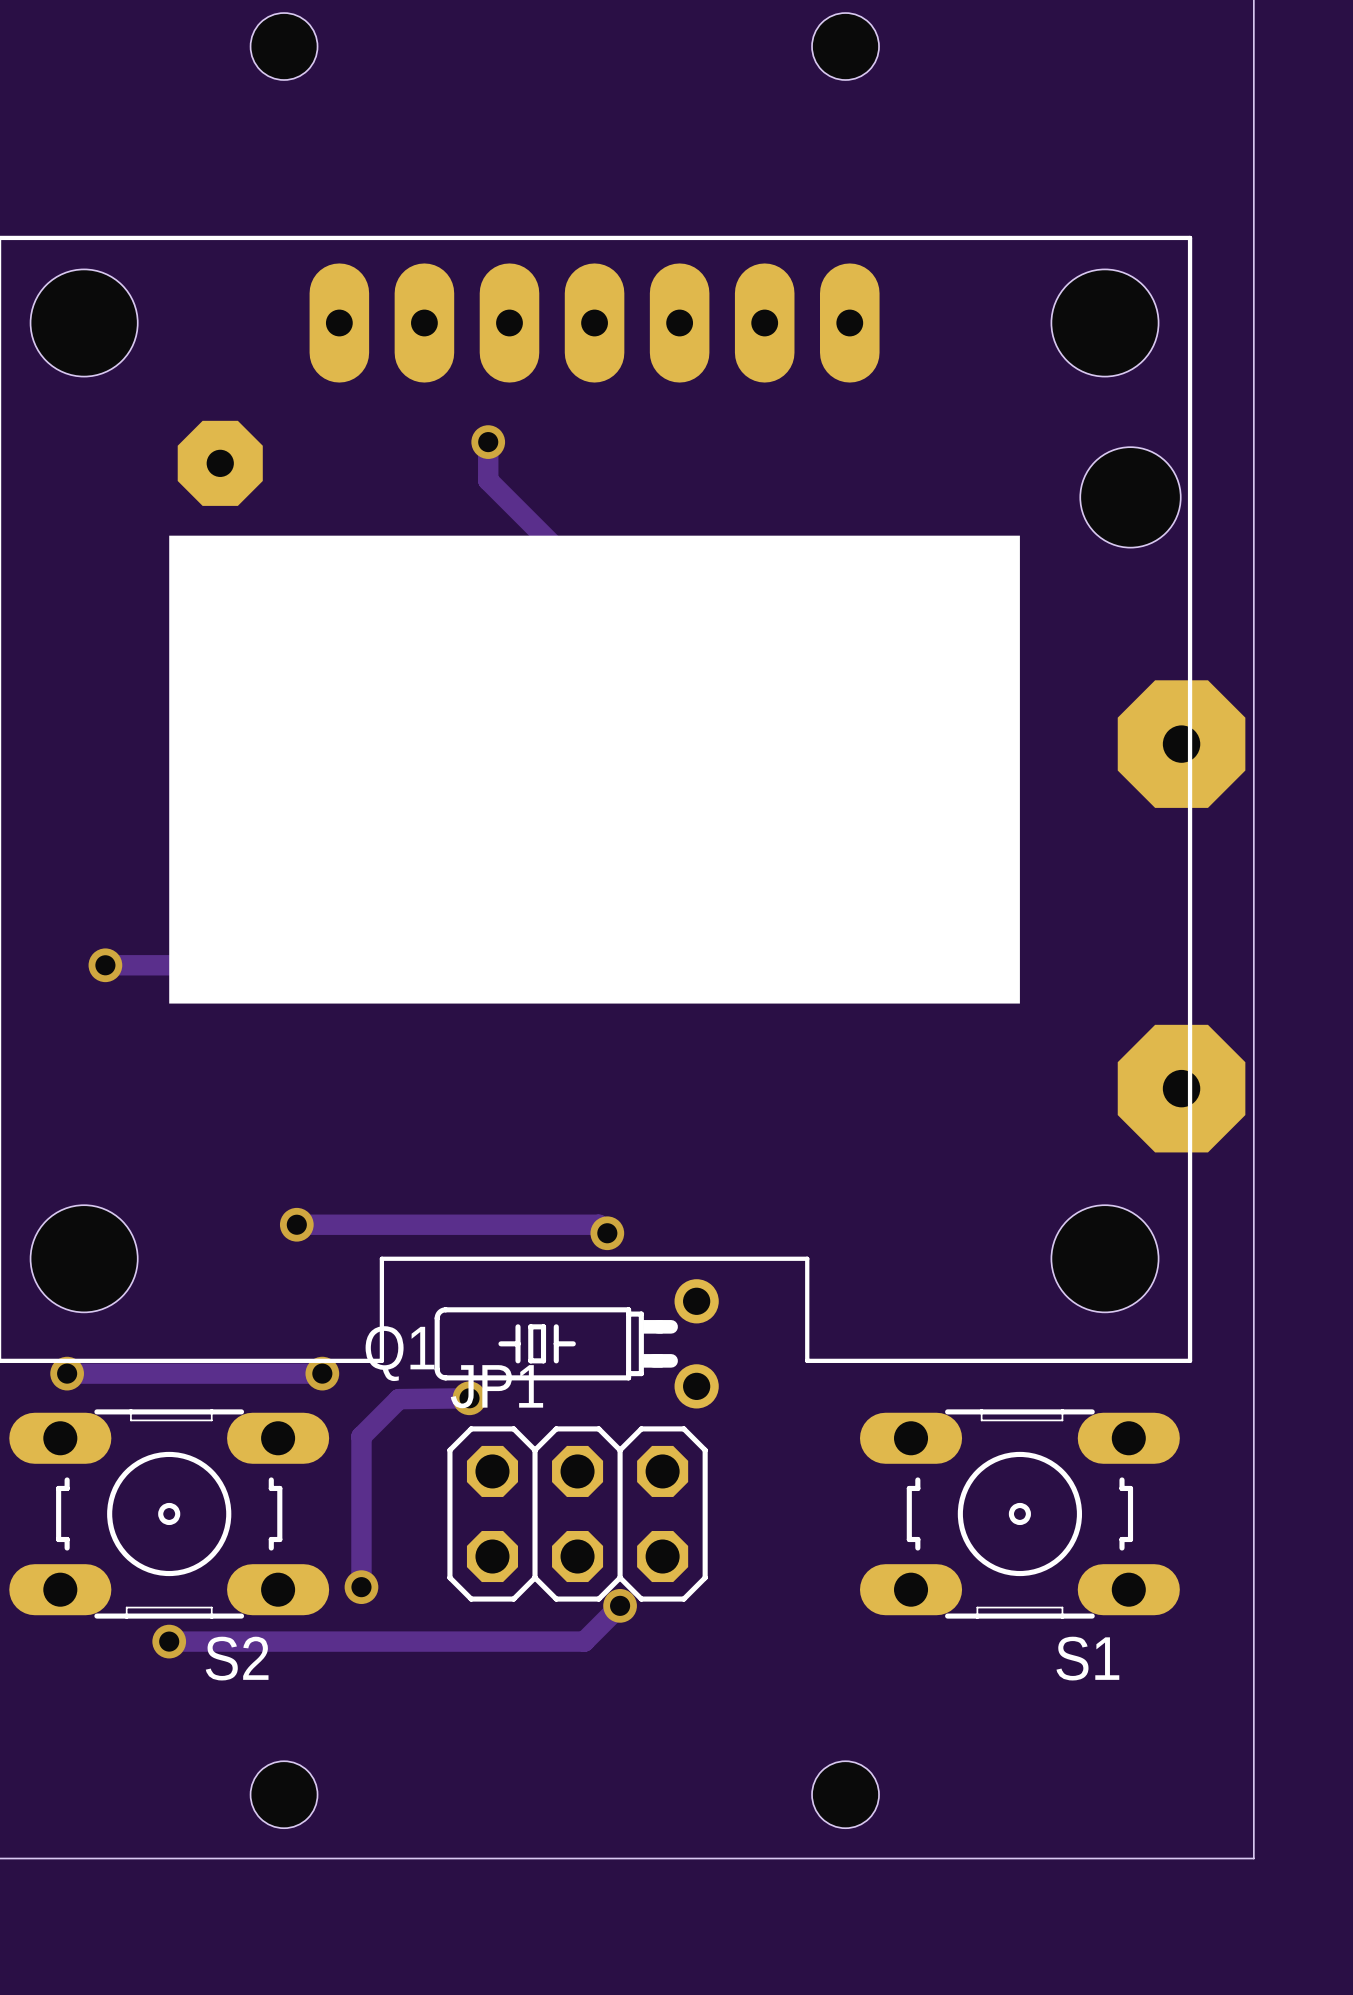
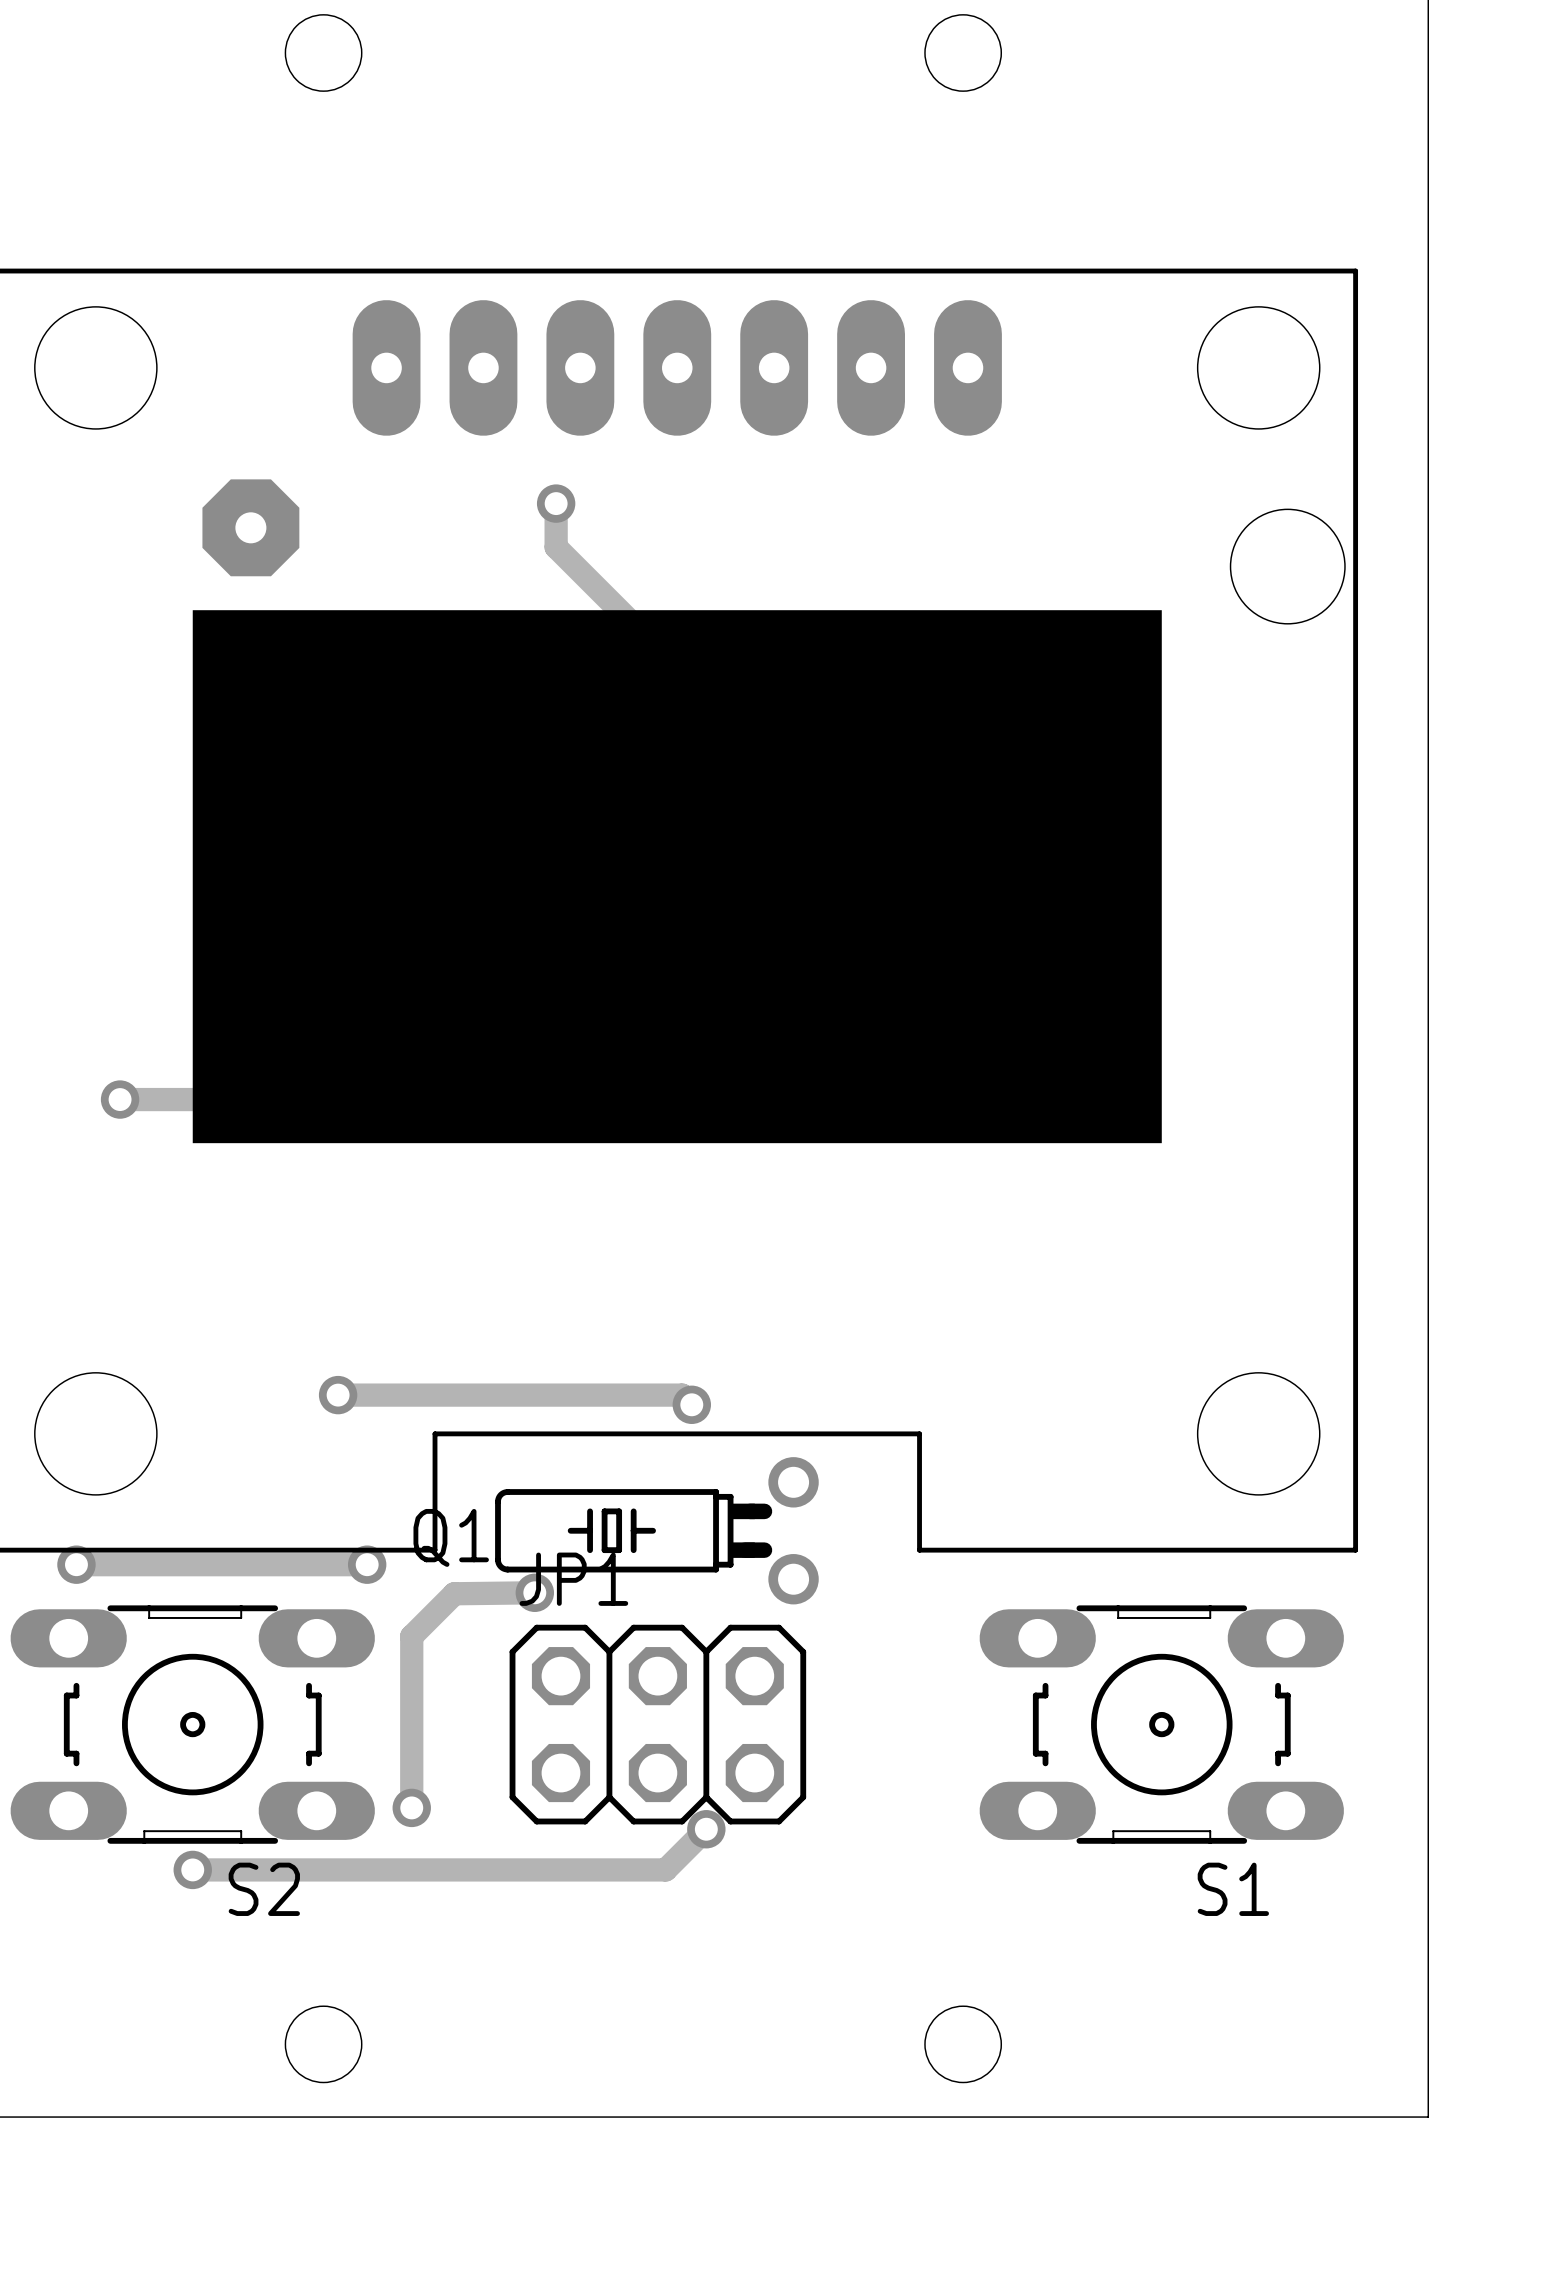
part: (1181, 744) -> none
part: (1181, 1088) -> none

